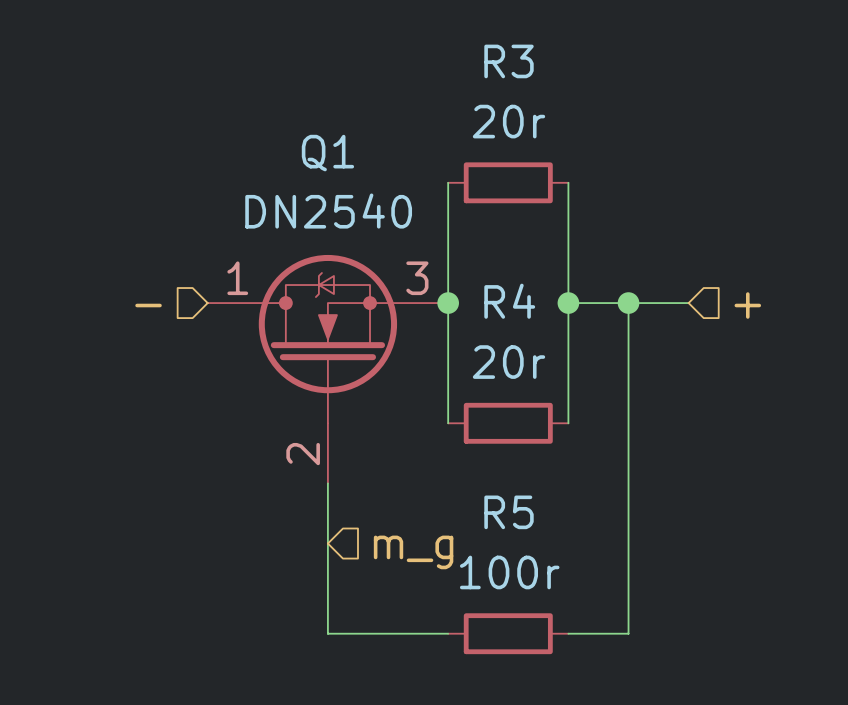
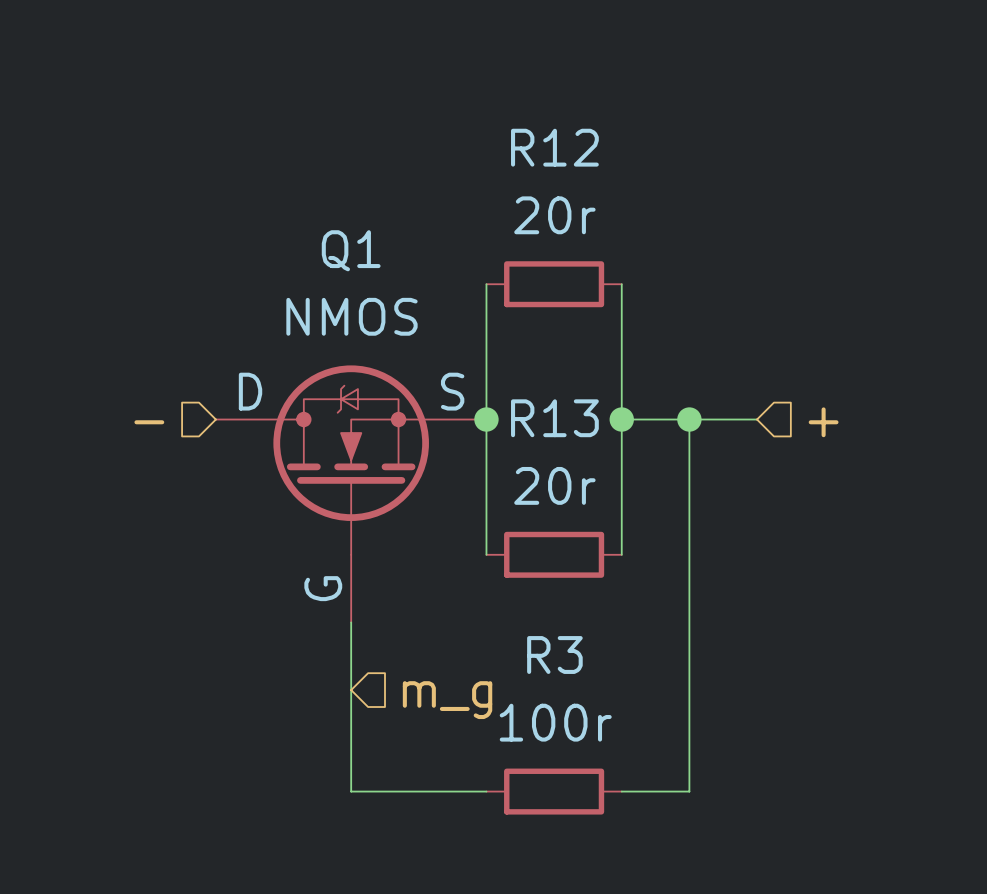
R3 name: R3 (509, 61) -> R12 (554, 147)
Q1 value: DN2540 (328, 211) -> NMOS (351, 316)
Q1 symbol: [207, 254, 449, 484] -> [215, 365, 487, 623]
R4 name: R4 (509, 301) -> R13 (554, 418)
R5 name: R5 (509, 512) -> R3 (554, 655)

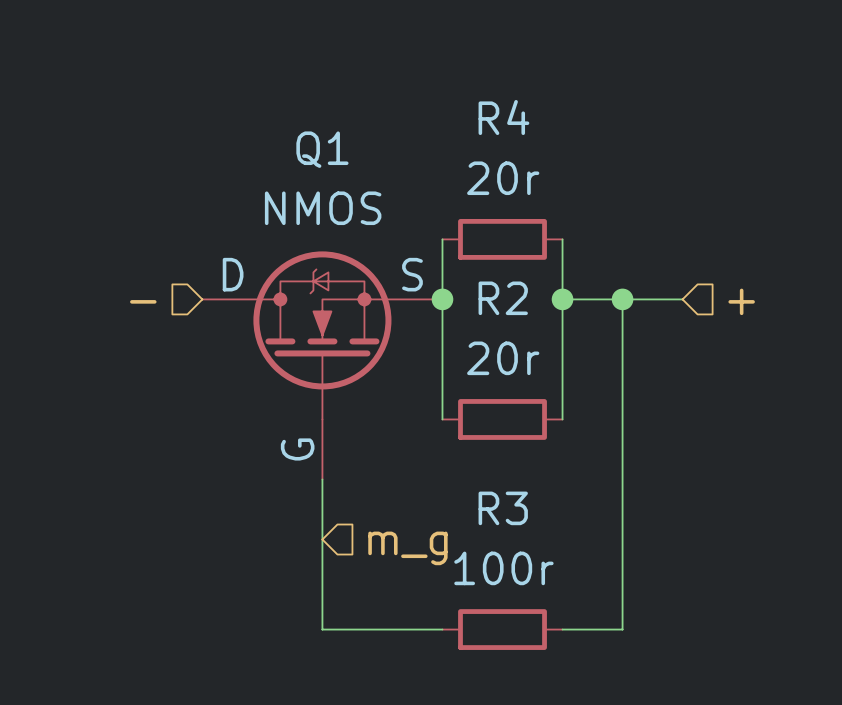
wire: (486, 284) (486, 351) -> none
R12: 20r (554, 284) -> none
wire: (621, 284) (621, 351) -> none
R4: none -> 20r (502, 239)
R13 name: R13 (554, 418) -> R2 (503, 298)

